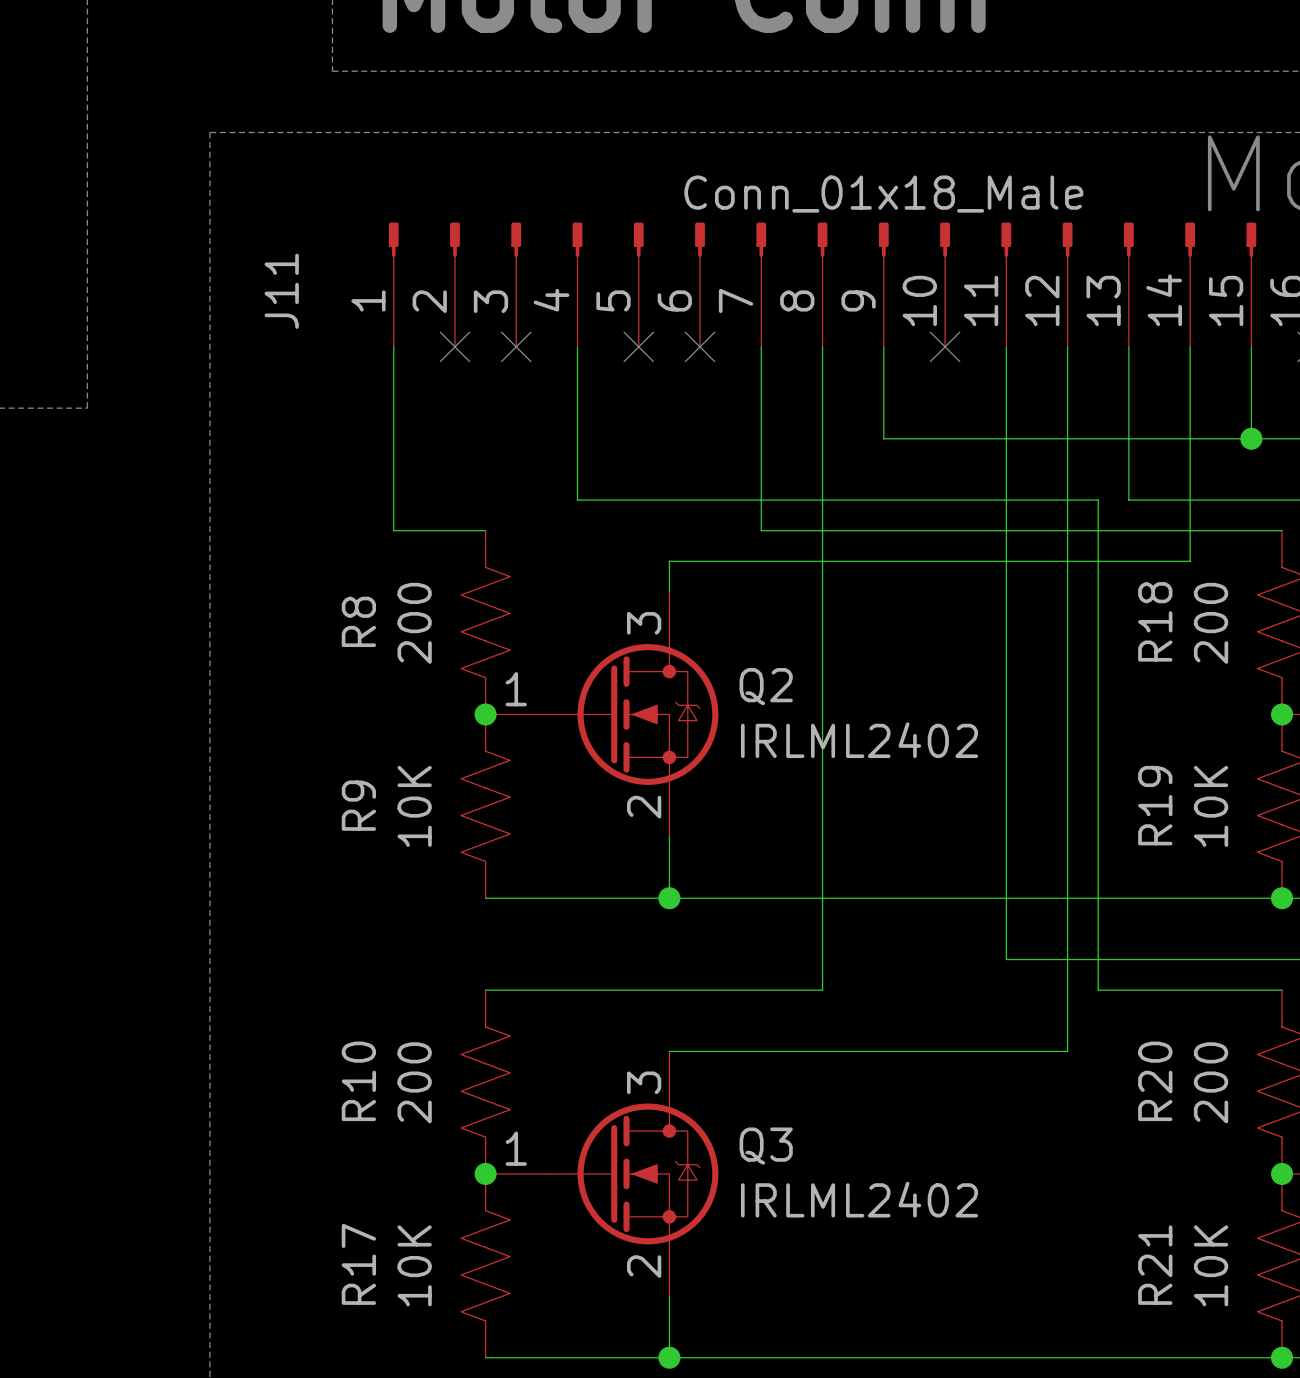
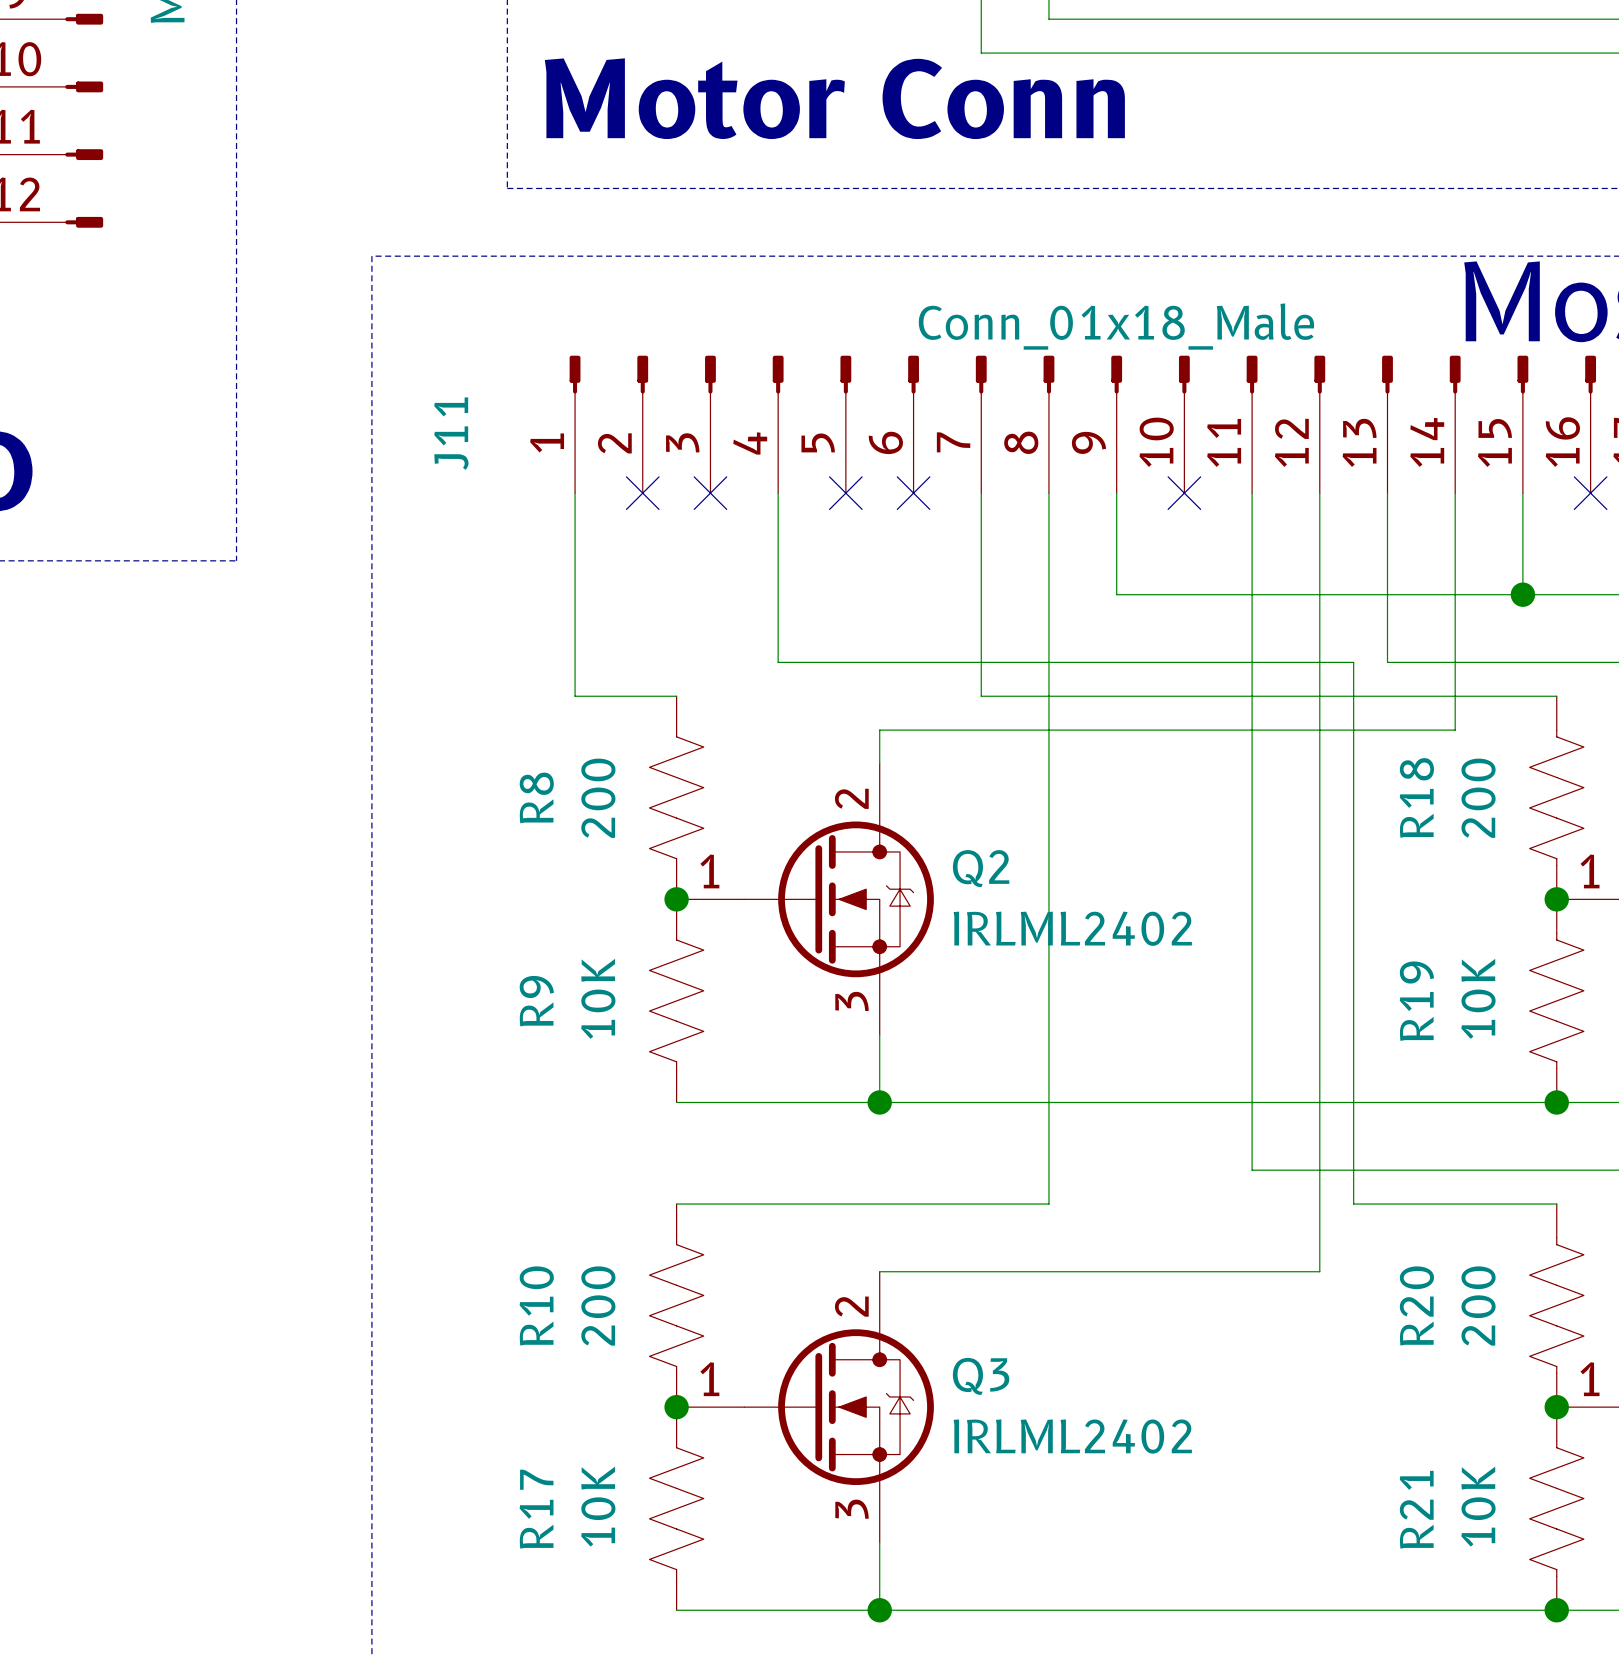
Q2 pin number: 3 (644, 623) -> 2 (851, 798)
Q2 pin number: 2 (644, 807) -> 3 (852, 1001)
Q3 pin number: 3 (644, 1082) -> 2 (851, 1306)
Q3 pin number: 2 (644, 1266) -> 3 (852, 1509)

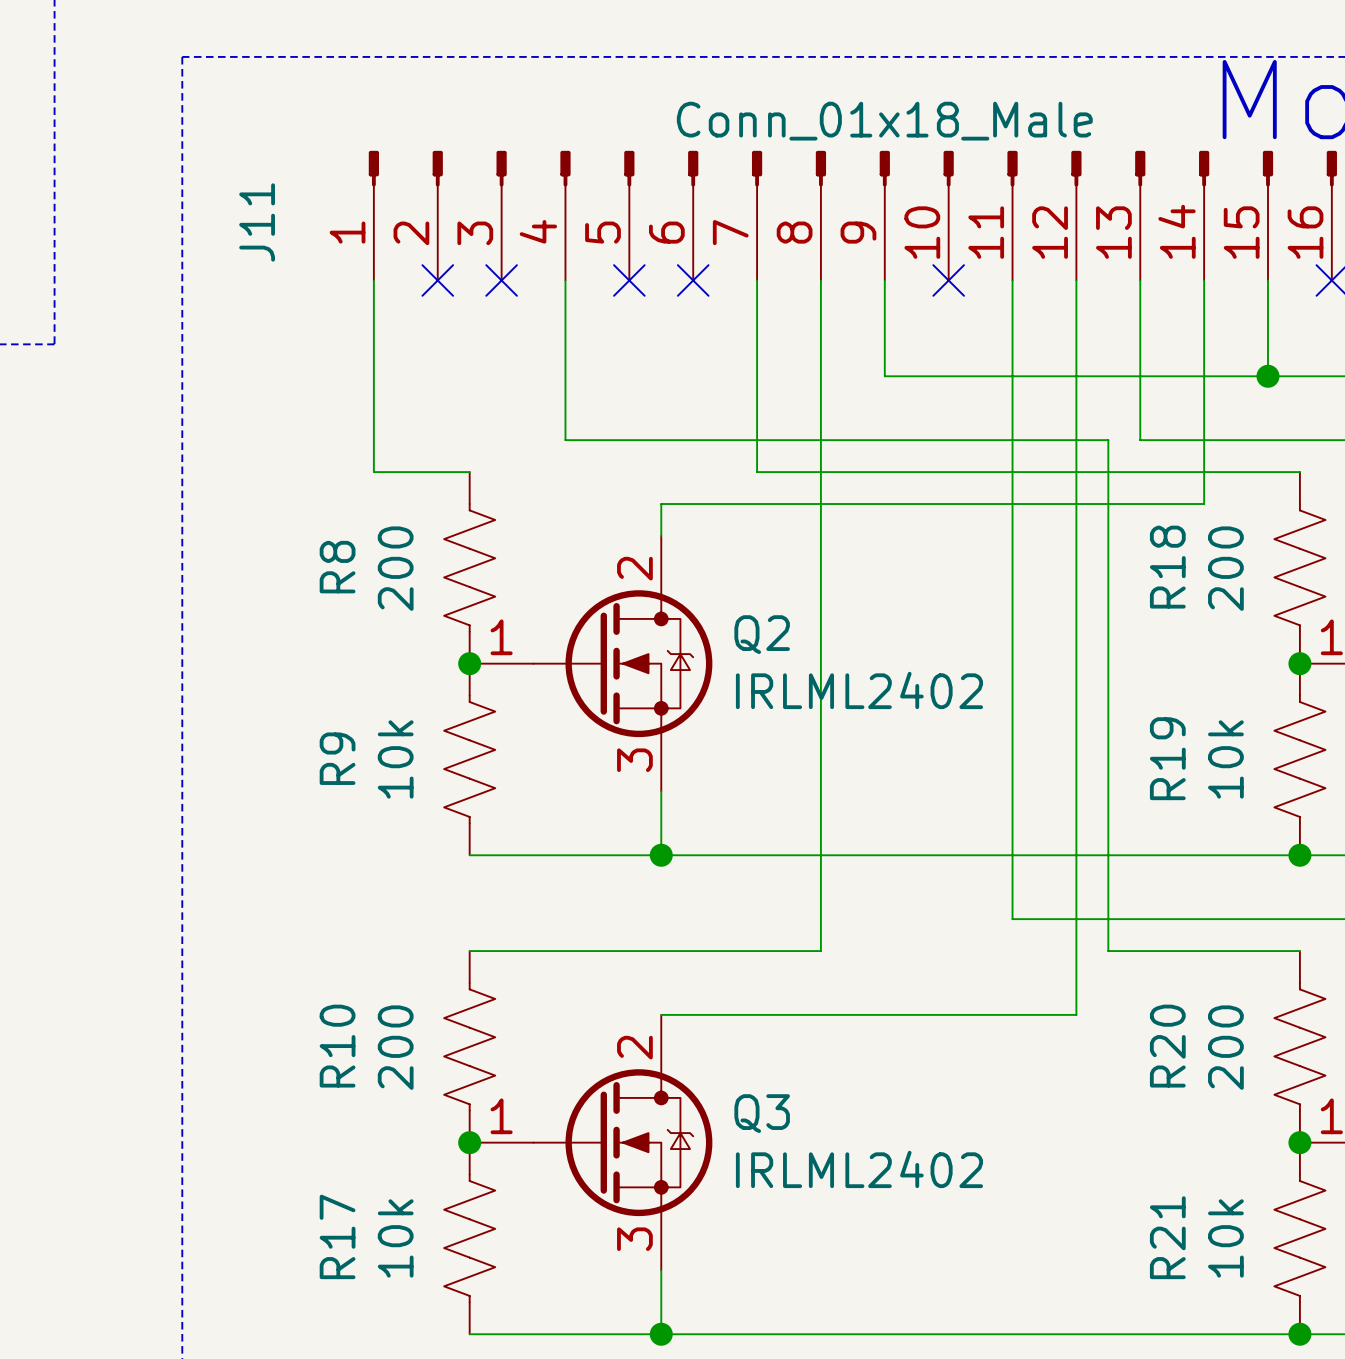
R9 value: 10K (598, 998) -> 10k (395, 759)
R19 value: 10K (1478, 998) -> 10k (1225, 759)
R17 value: 10K (598, 1506) -> 10k (395, 1238)
R21 value: 10K (1478, 1506) -> 10k (1225, 1238)

